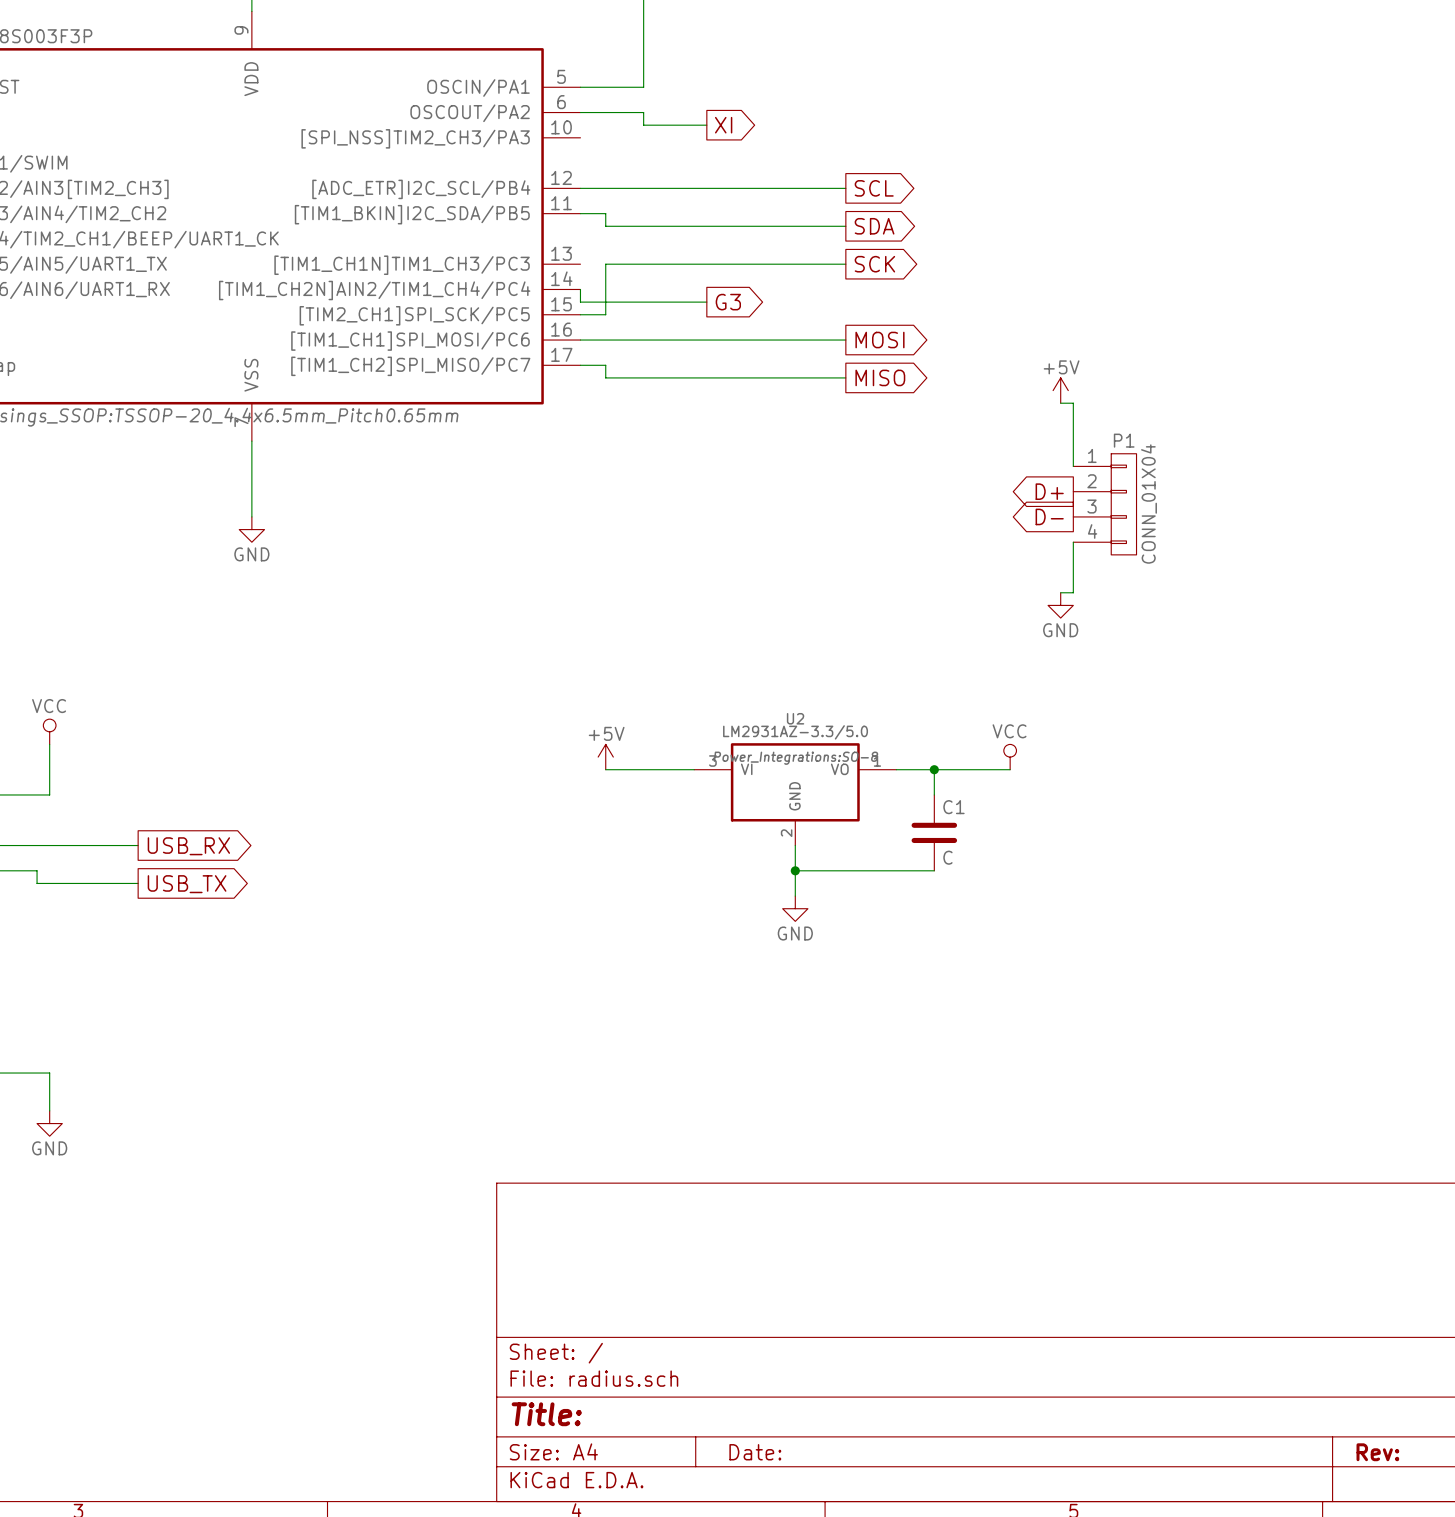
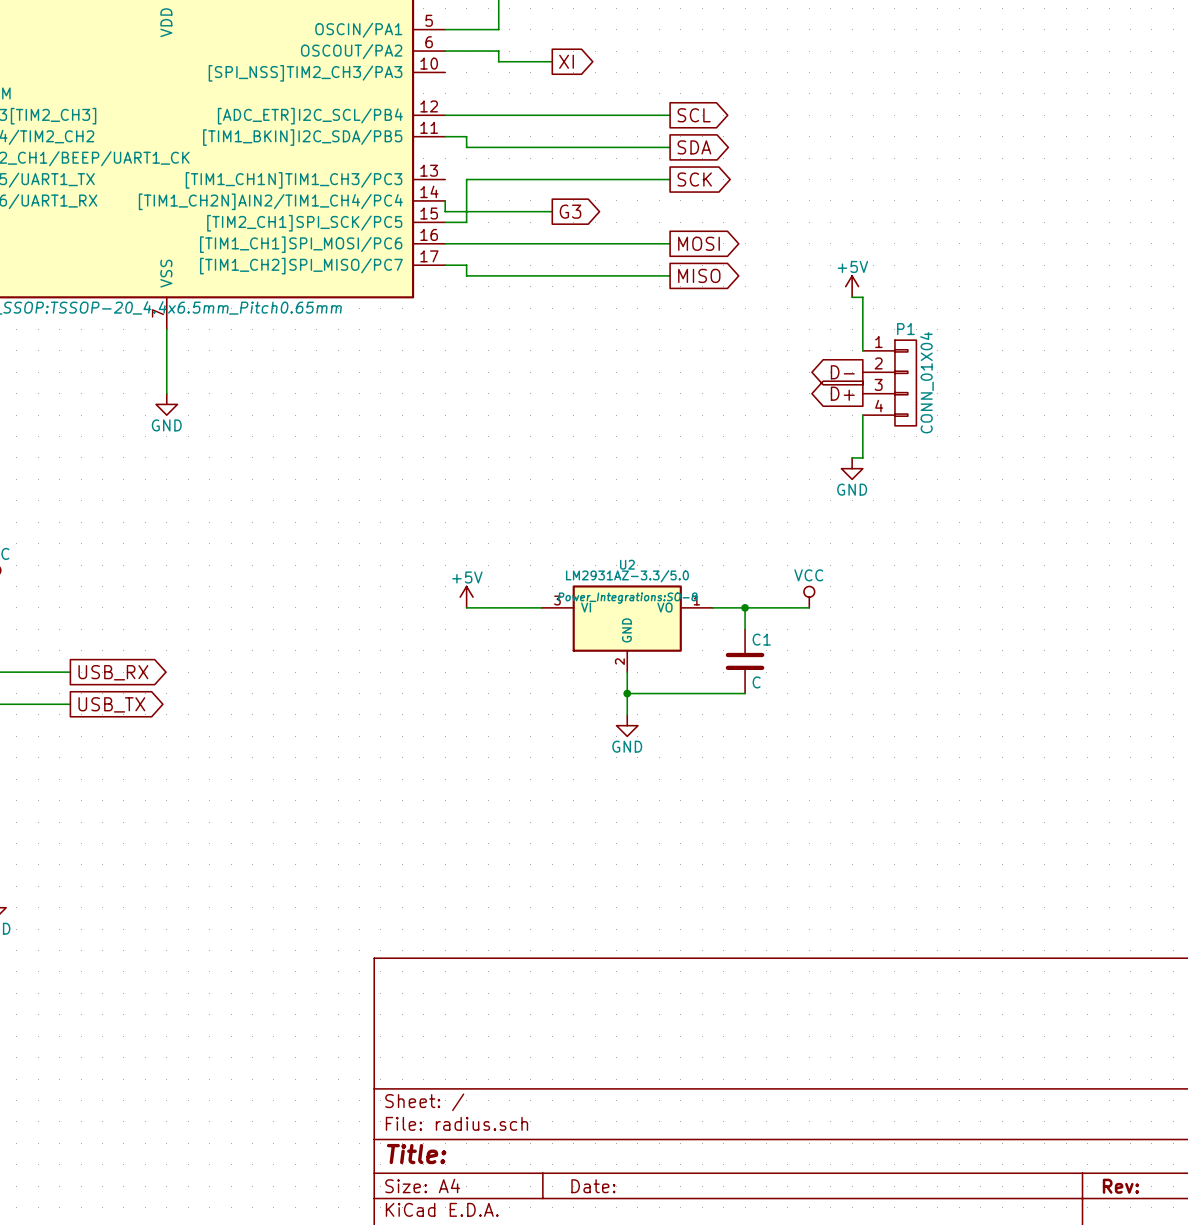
global label: D+ (1049, 491) -> D- (842, 372)
global label: D- (1049, 516) -> D+ (842, 393)

